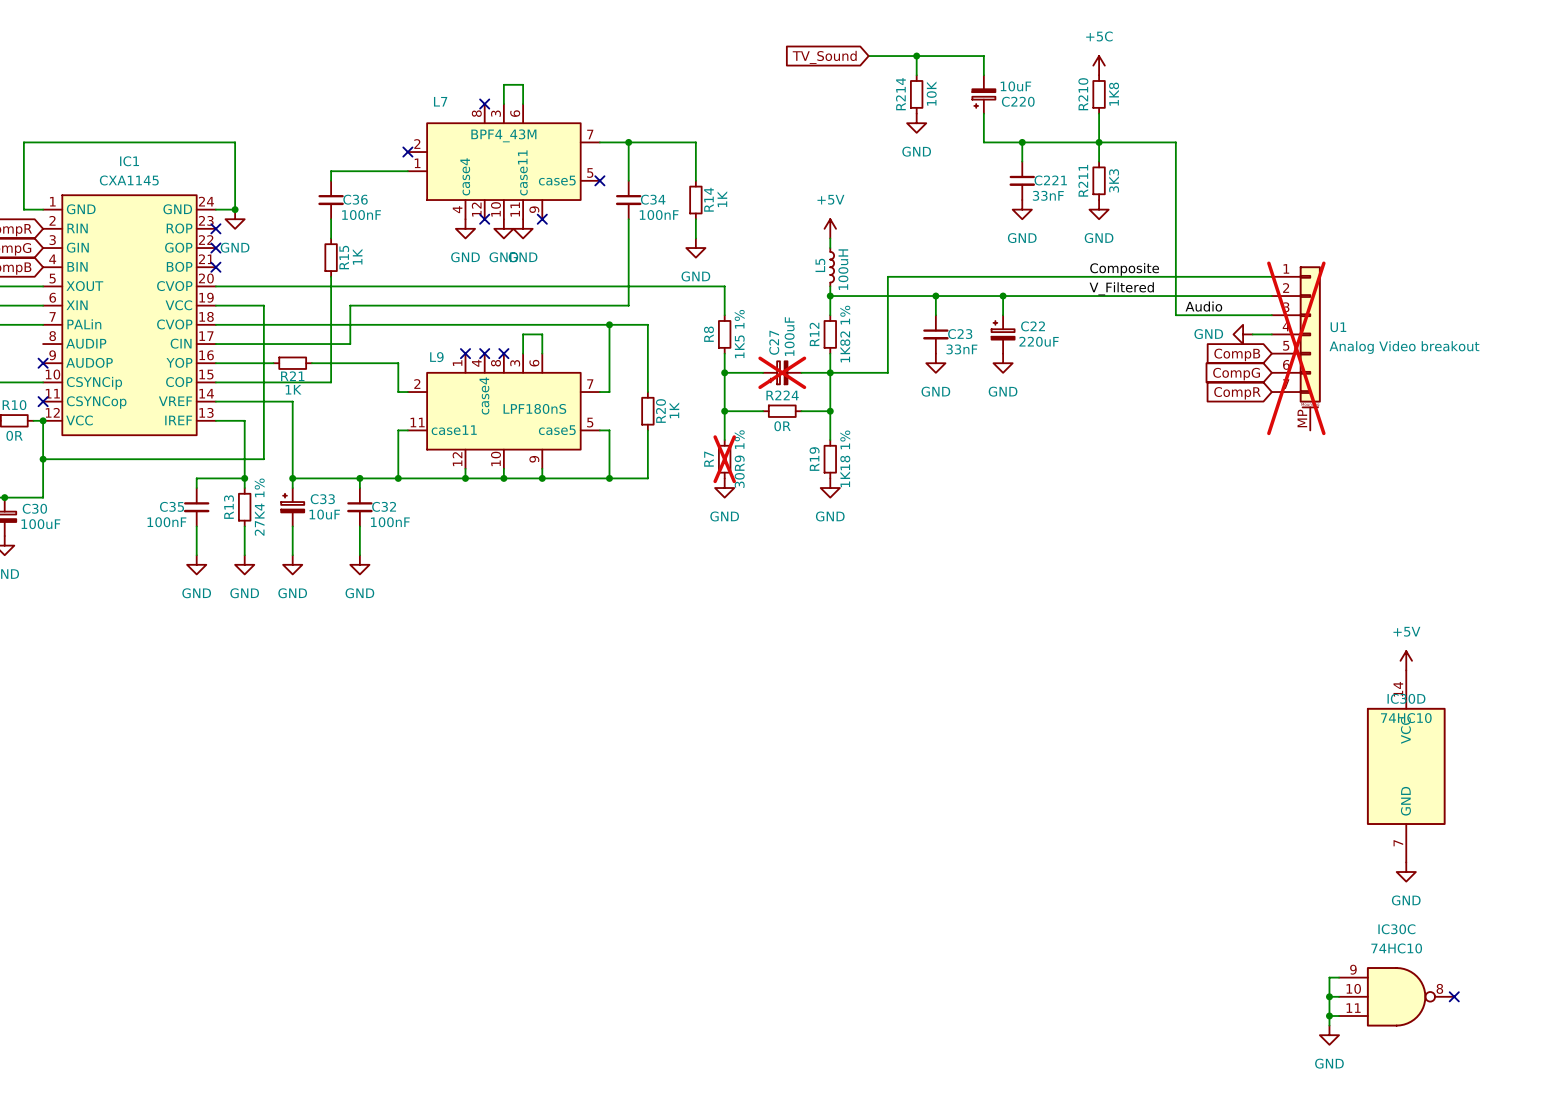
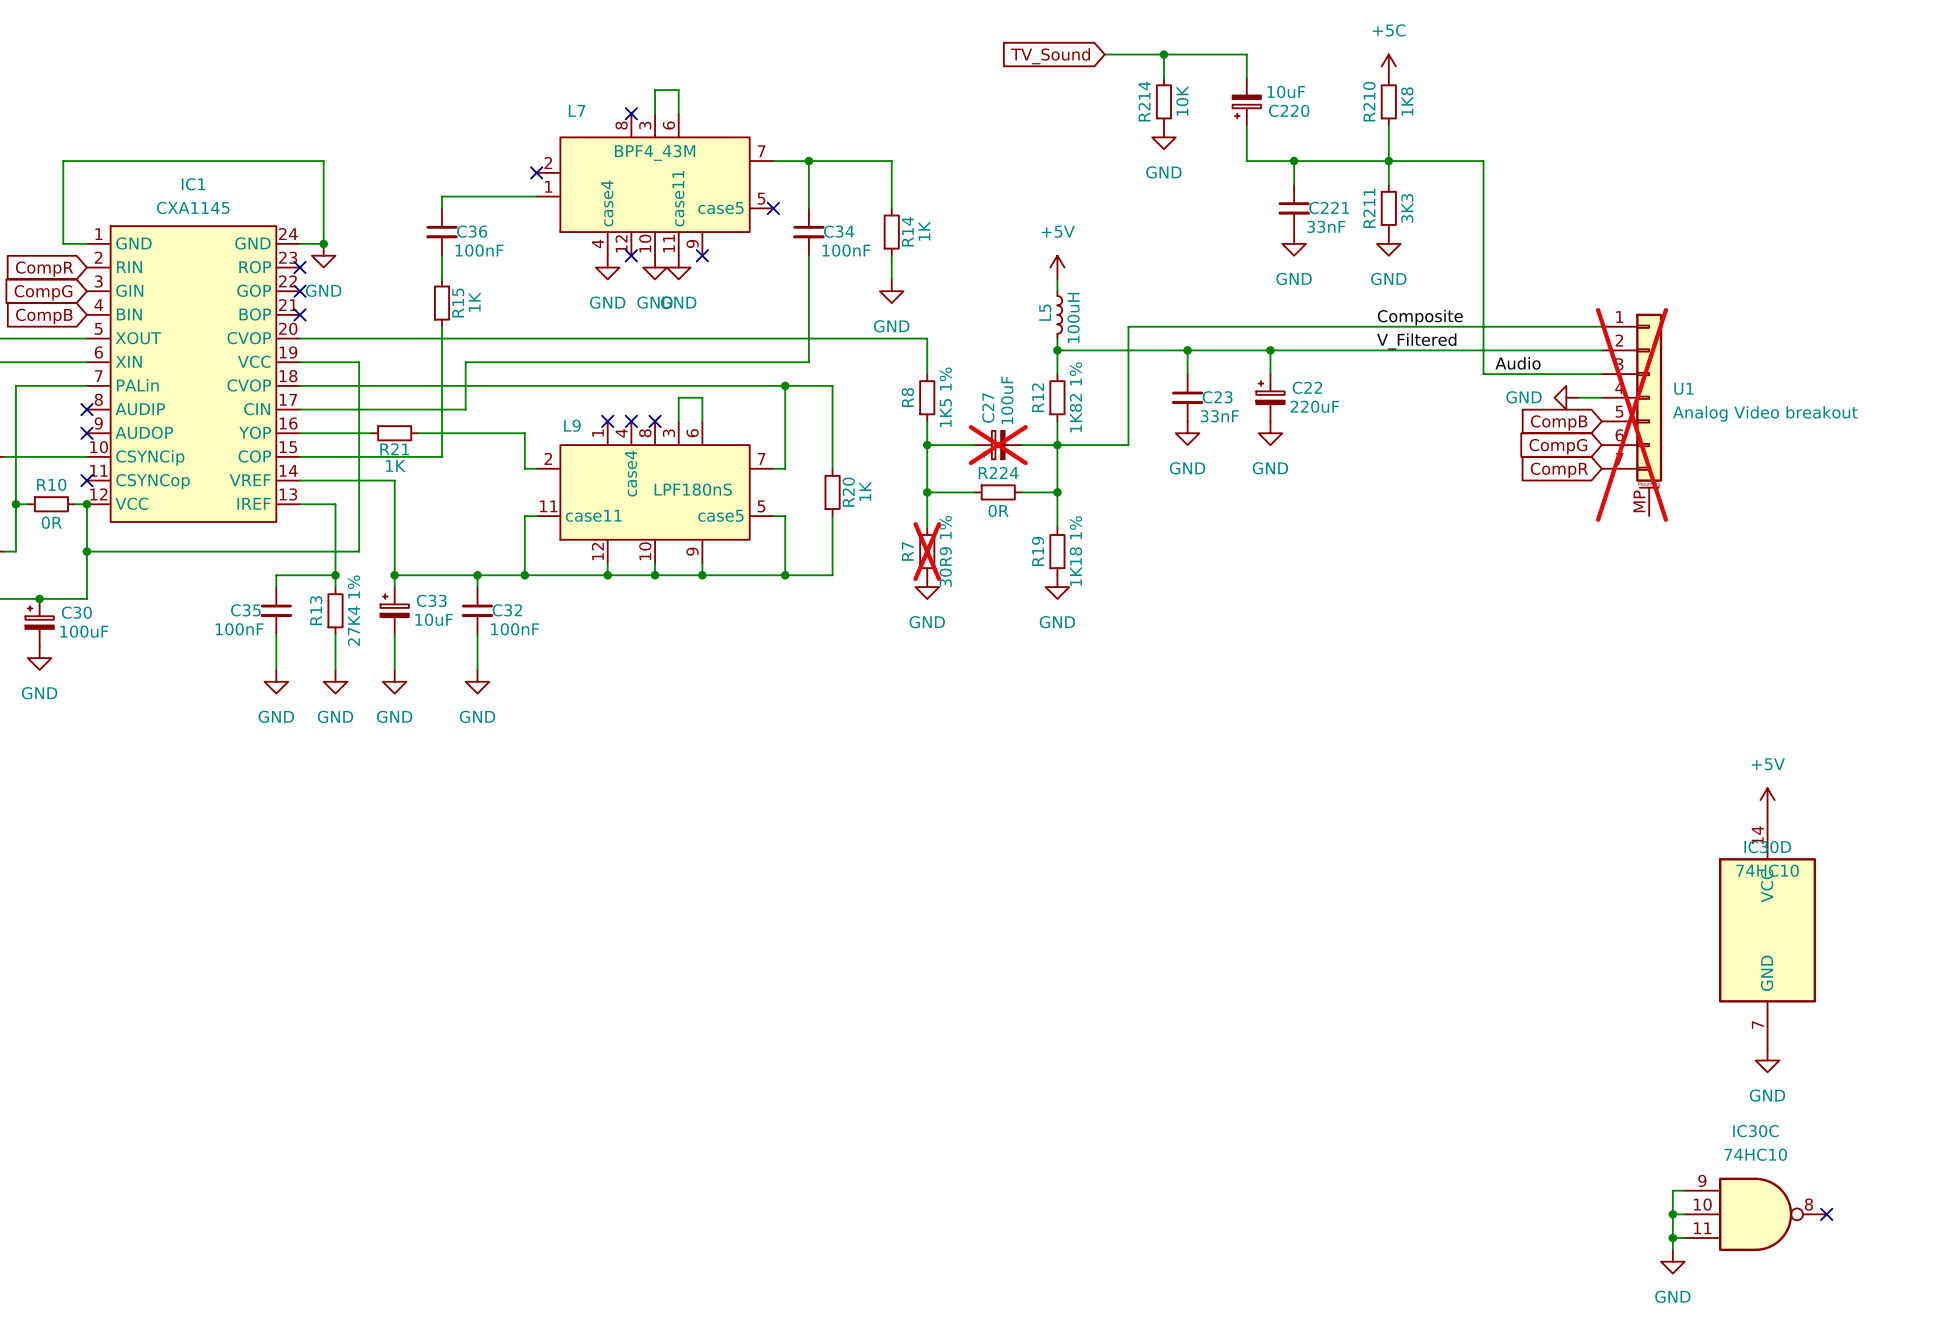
no-connect mark: none -> (86, 409)

